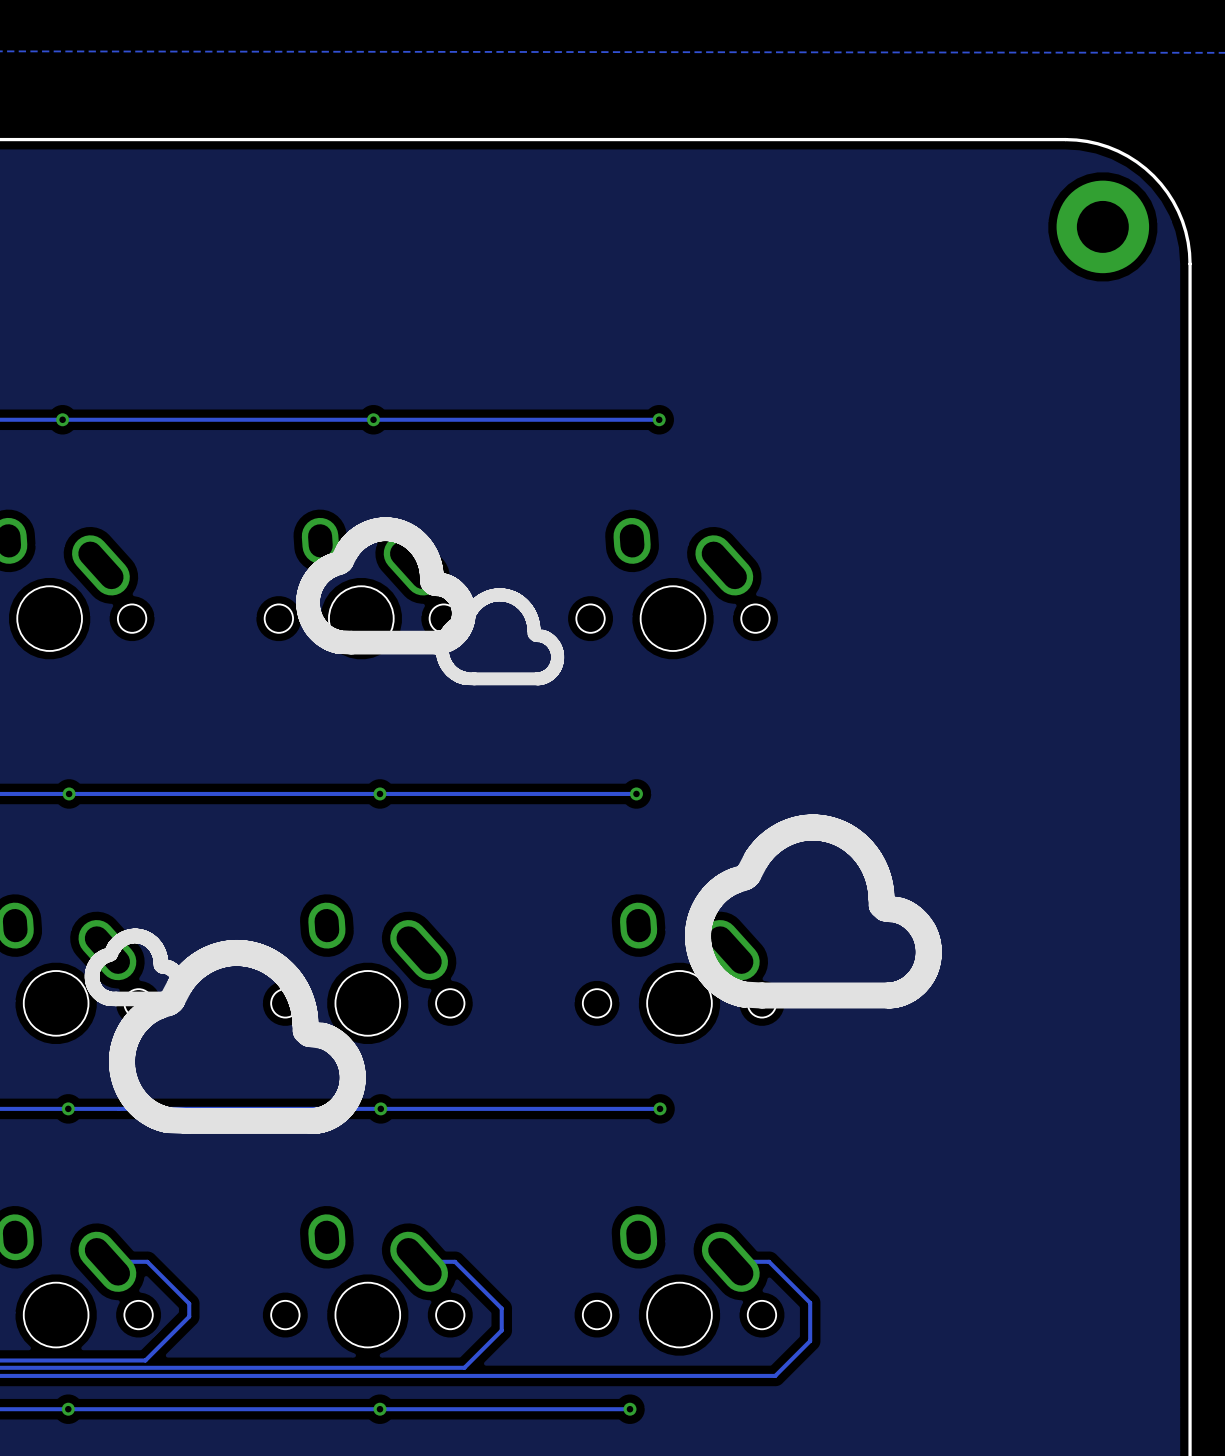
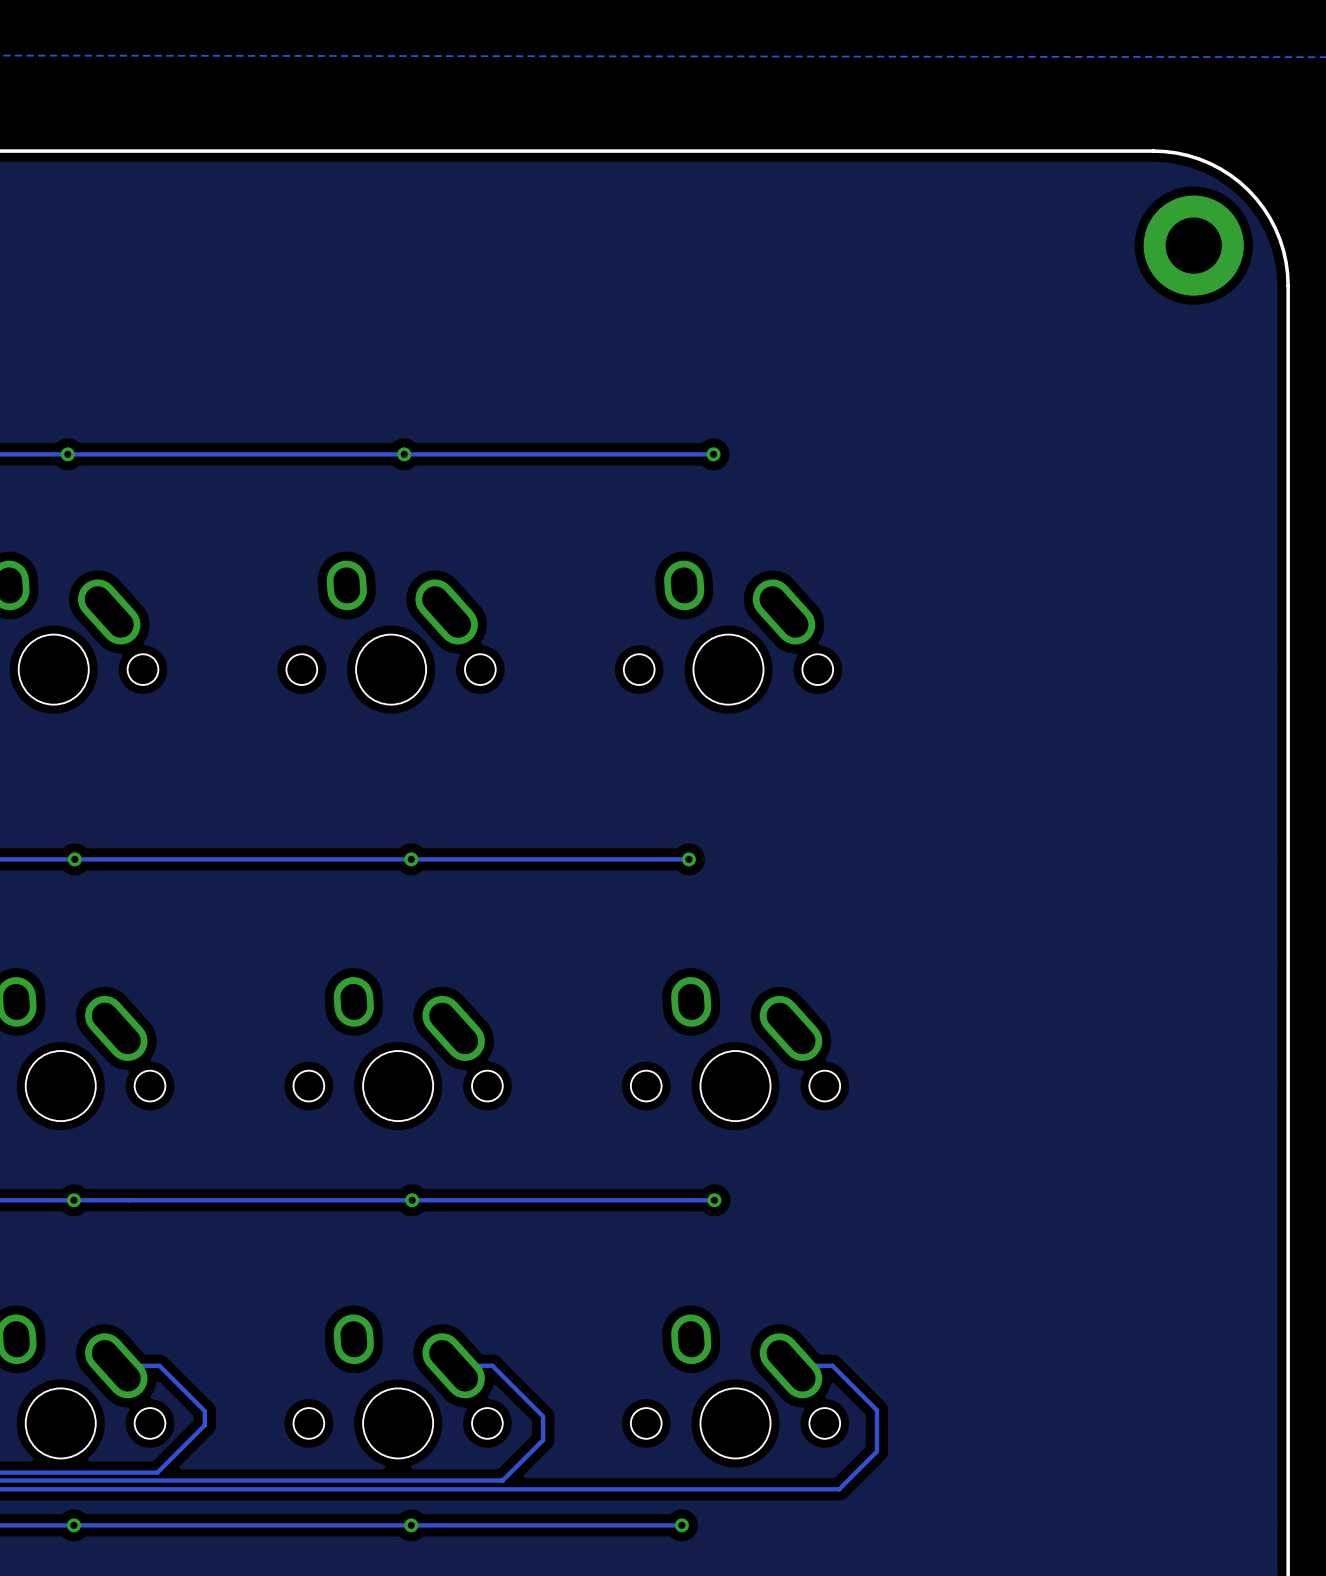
line: (387, 529) (373, 530) (360, 536) (350, 546) (341, 561) (326, 568) (316, 577) (310, 588) (308, 599) (309, 612) (313, 624) (324, 635) (339, 641) (437, 642) (449, 639) (457, 632) (462, 621) (463, 609) (460, 598) (448, 587) (432, 581) (428, 559) (416, 541) (403, 533) (387, 529) -> none
line: (471, 610) (481, 600) (492, 595) (506, 595) (518, 600) (530, 615) (534, 633) (546, 637) (554, 646) (557, 657) (554, 667) (547, 675) (538, 678) (474, 678) (456, 675) (444, 661) (442, 643) (451, 627) (467, 618) -> none
line: (816, 827) (795, 830) (776, 838) (760, 853) (747, 875) (725, 885) (710, 898) (702, 913) (698, 929) (699, 947) (704, 964) (713, 976) (722, 984) (744, 994) (890, 995) (907, 990) (919, 979) (927, 964) (928, 947) (923, 930) (916, 921) (906, 913) (885, 908) (881, 905) (880, 888) (876, 872) (868, 857) (859, 846) (839, 833) (816, 827) -> none
line: (113, 947) (121, 940) (130, 936) (140, 936) (149, 940) (158, 951) (160, 965) (170, 968) (176, 974) (178, 982) (176, 990) (171, 996) (164, 998) (116, 998) (102, 996) (94, 986) (92, 972) (98, 960) (110, 953) -> none
line: (237, 952) (218, 955) (200, 964) (184, 978) (171, 1000) (148, 1011) (134, 1024) (125, 1040) (122, 1057) (123, 1076) (130, 1093) (146, 1110) (168, 1120) (314, 1120) (331, 1115) (343, 1105) (351, 1089) (352, 1072) (347, 1056) (340, 1046) (330, 1039) (309, 1033) (305, 1030) (304, 1013) (300, 997) (292, 982) (283, 971) (261, 957) (237, 952) -> none

